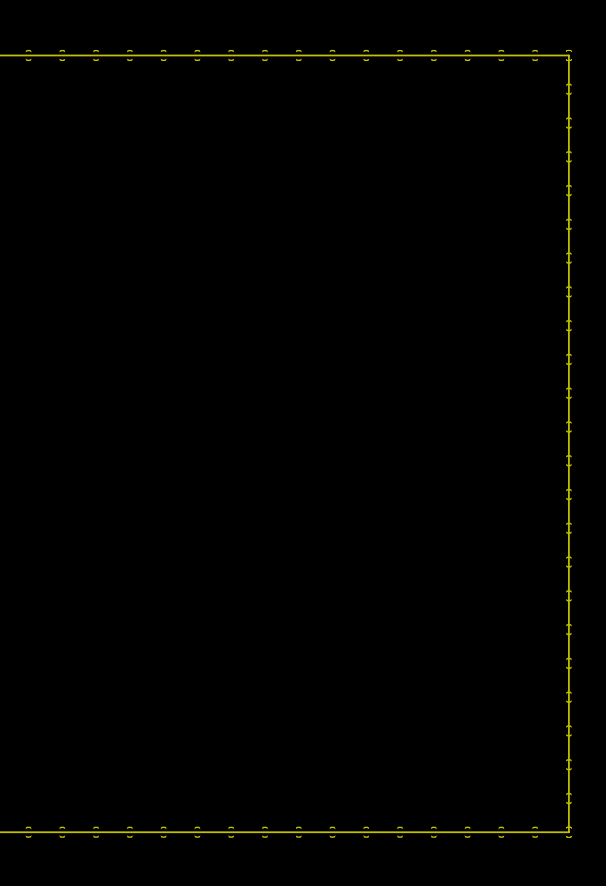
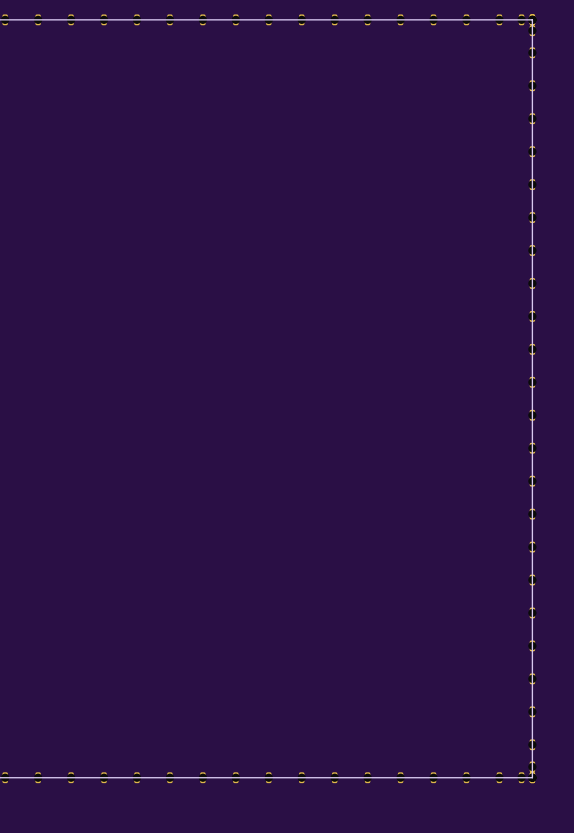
part: none -> (521, 19)
part: none -> (532, 30)
part: none -> (532, 766)
part: none -> (521, 777)

